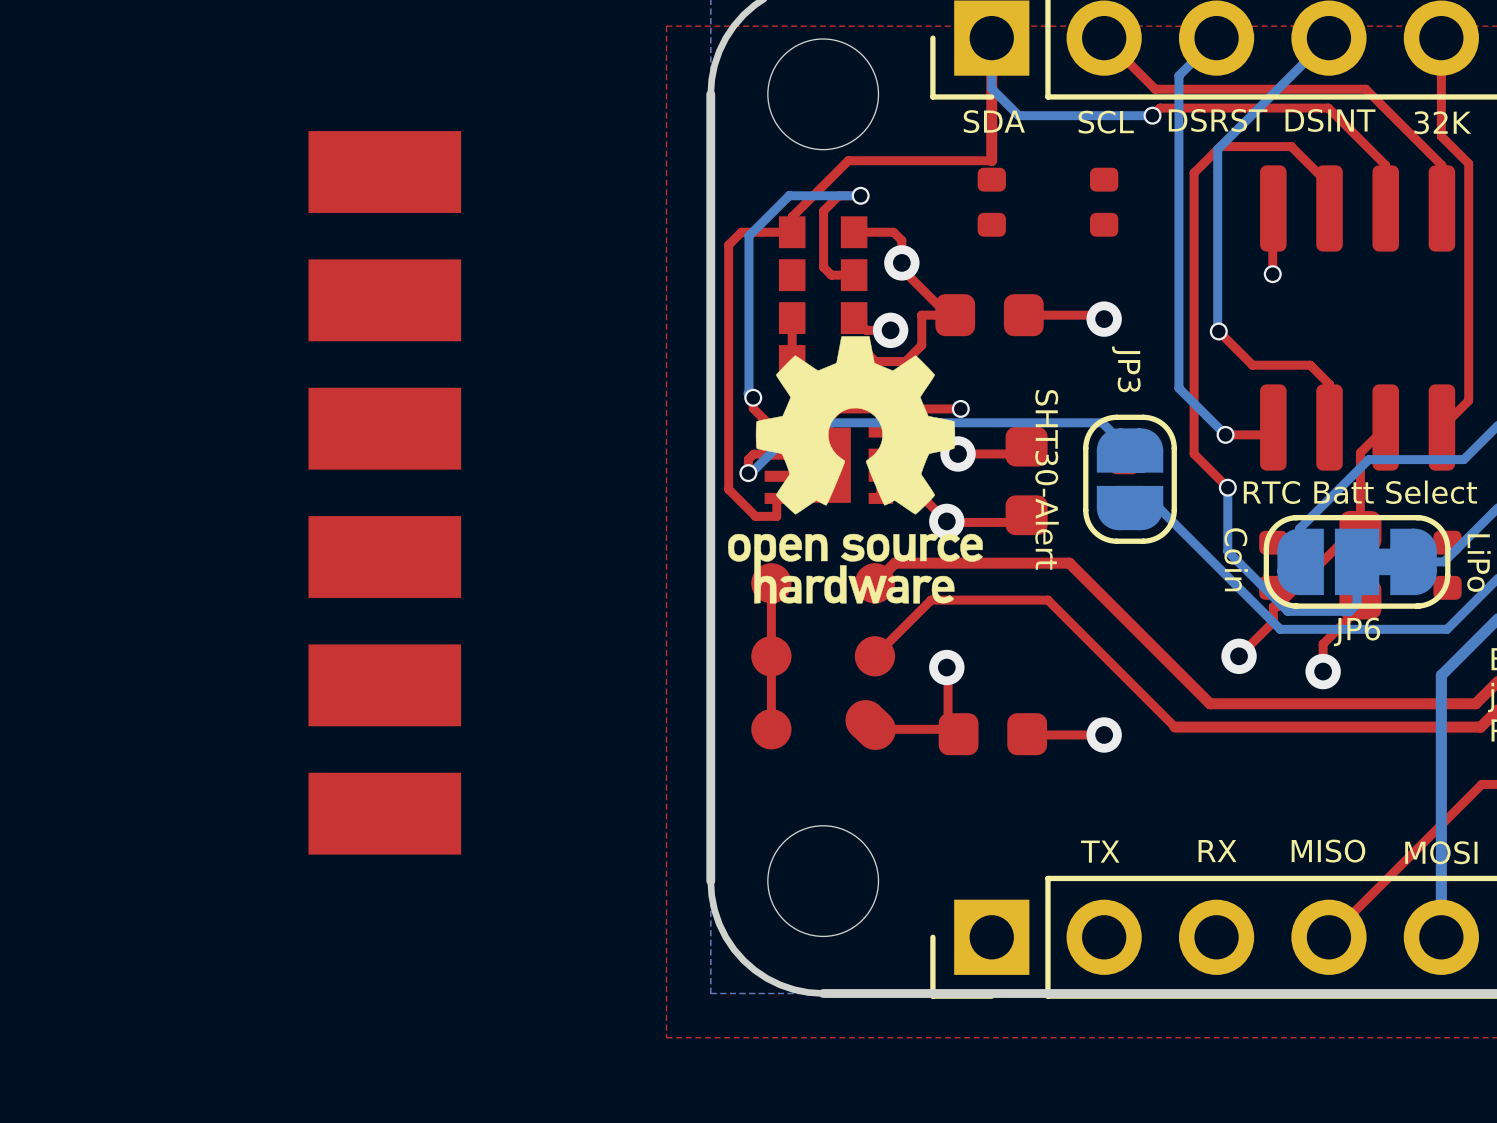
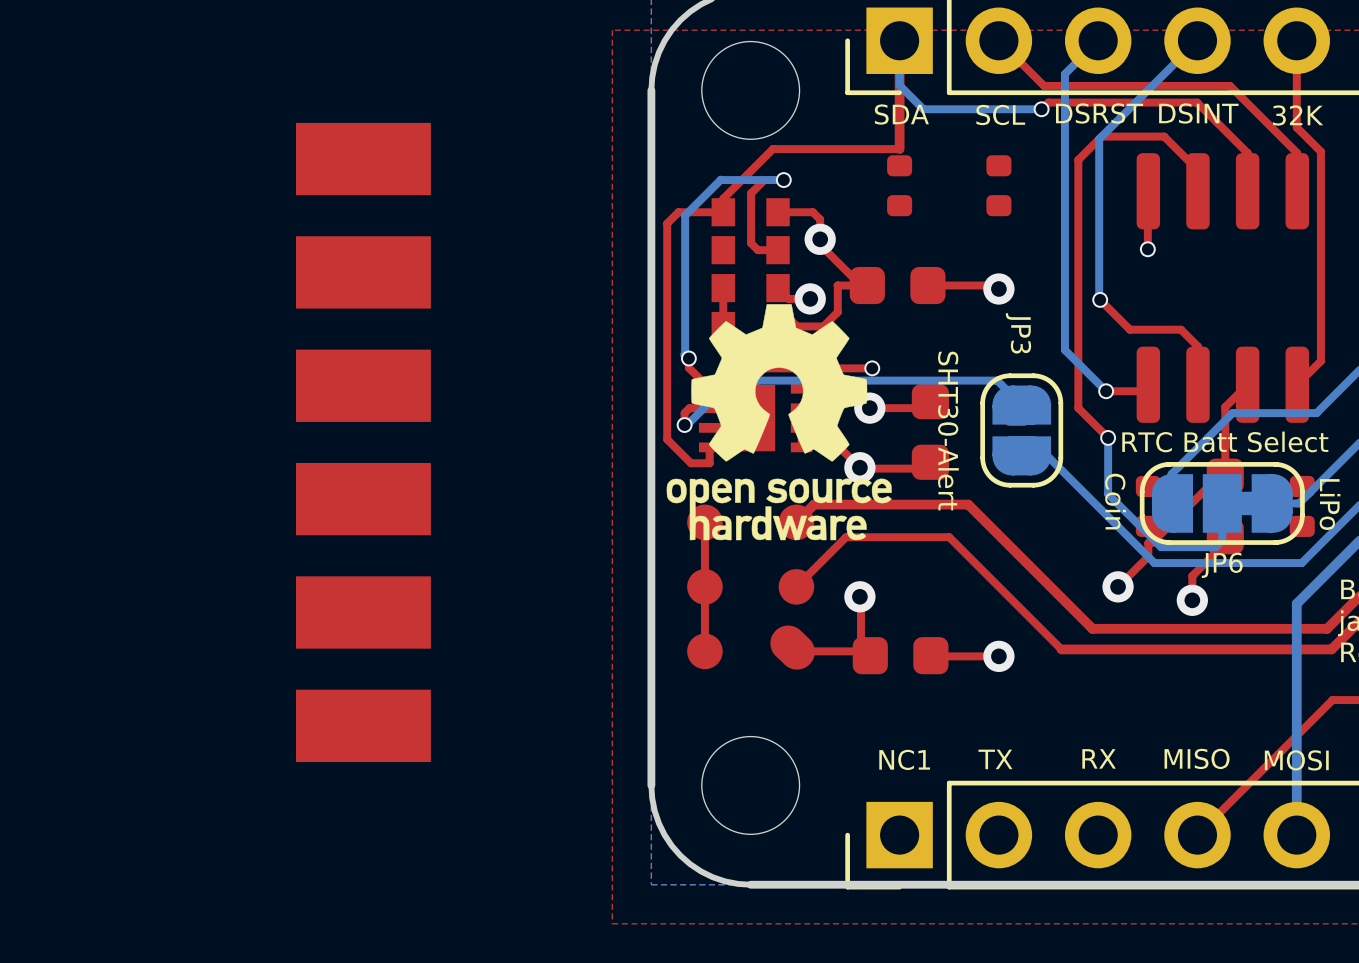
text: none -> NC1 (904, 759)

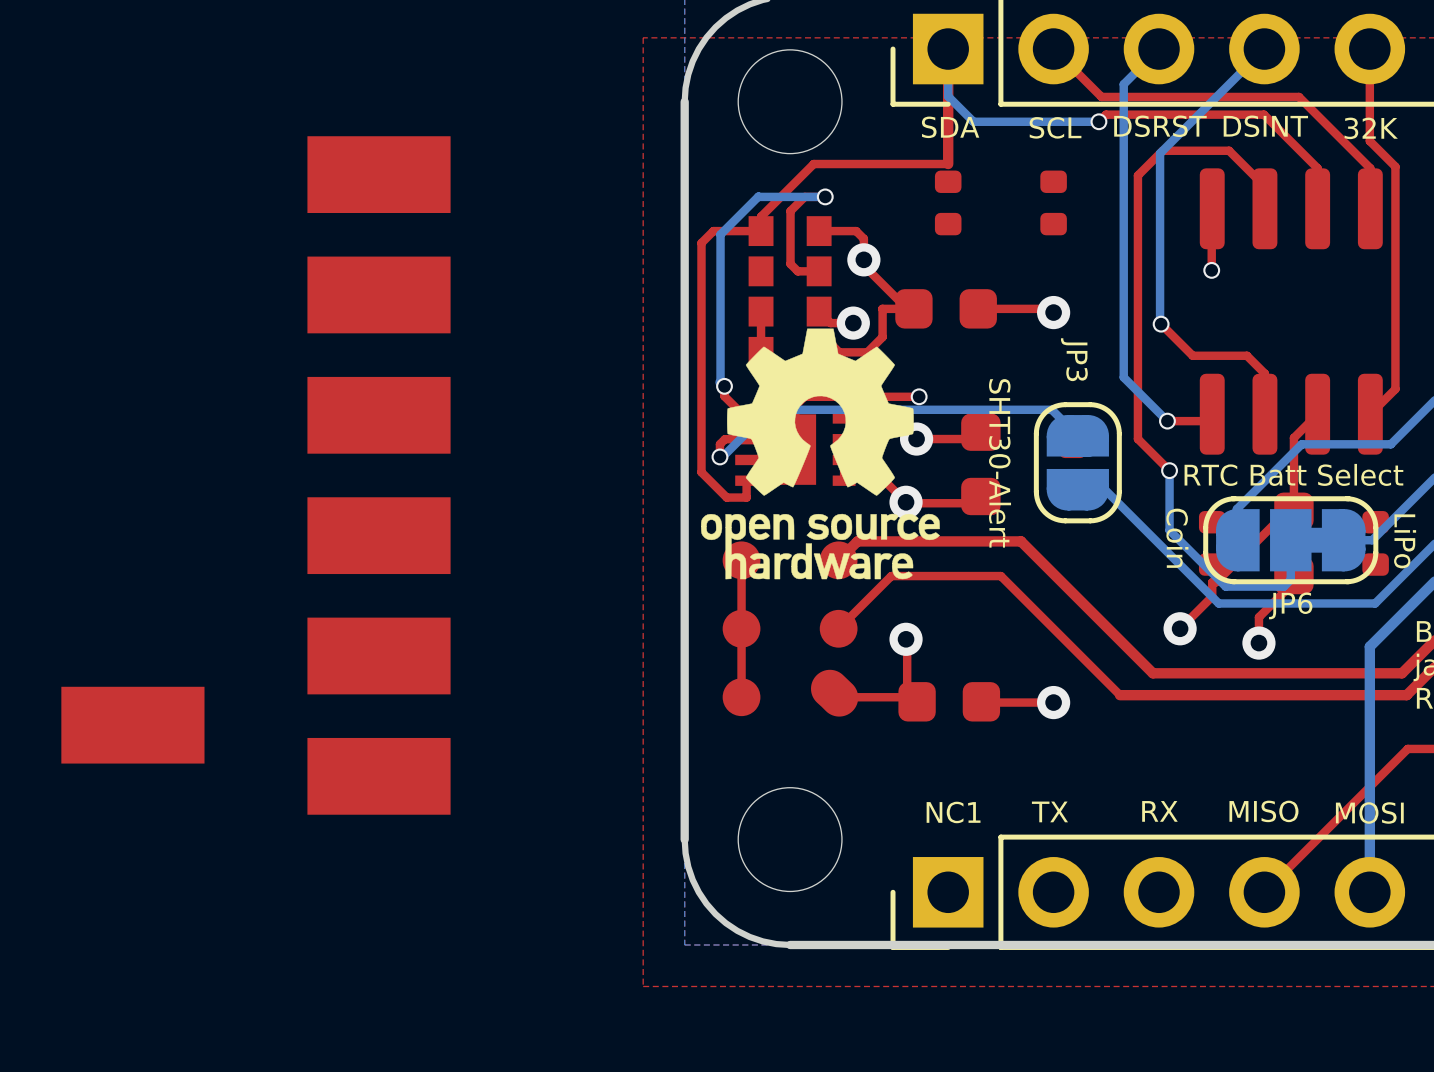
part: none -> (132, 725)

